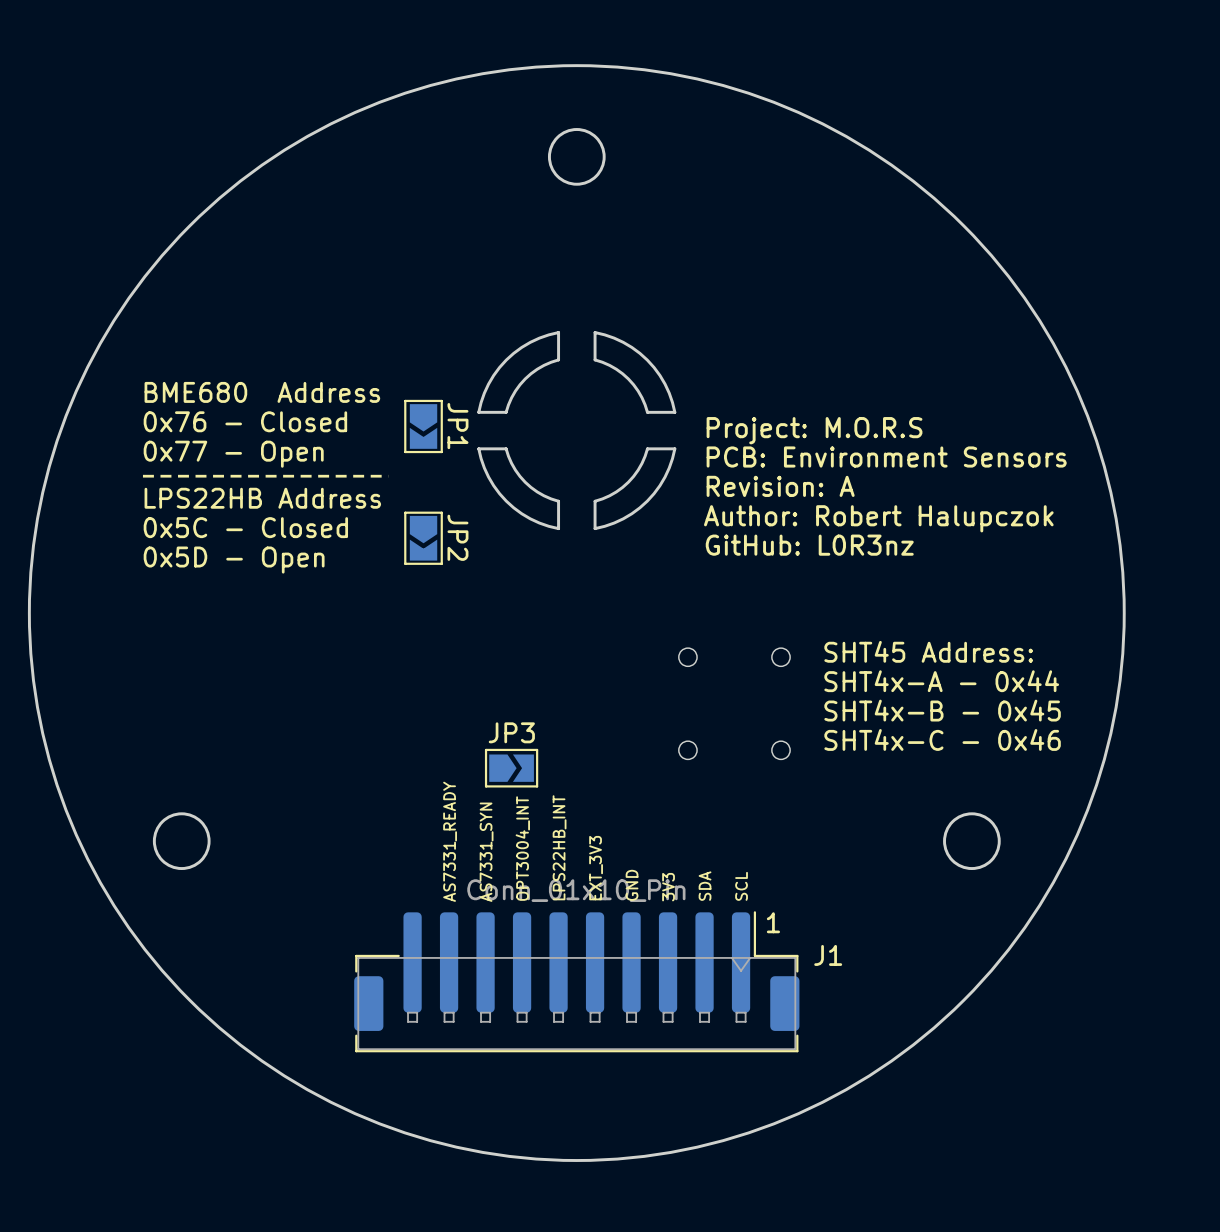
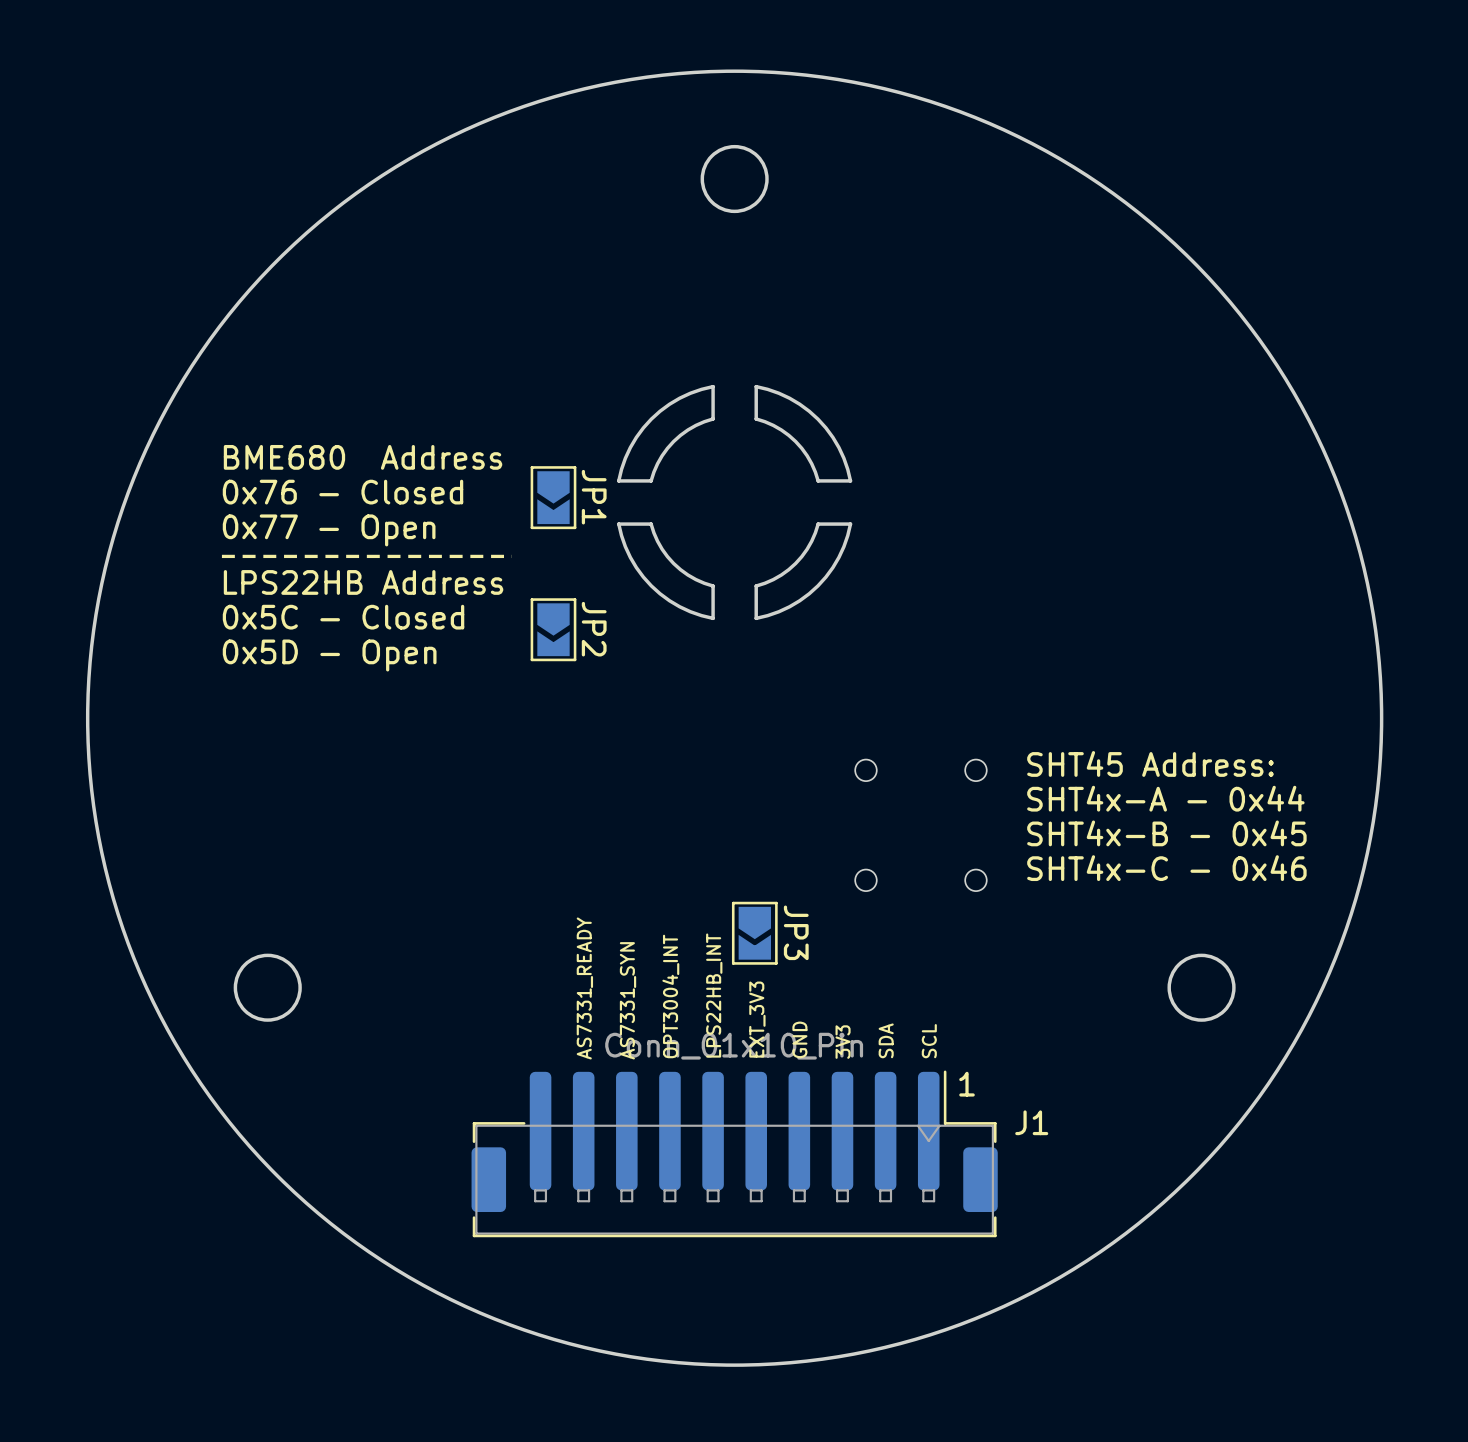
text: Project: M.O.R.S (814, 430) -> none
text: PCB: Environment Sensors (886, 457) -> none
text: Revision: A (780, 486) -> none
text: Author: Robert Halupczok (878, 518) -> none
text: GitHub: L0R3nz (809, 545) -> none
JP3 rotation: 0° (511, 768) -> 90° clockwise (754, 933)
JP3 position: (511, 768) -> (754, 933)

